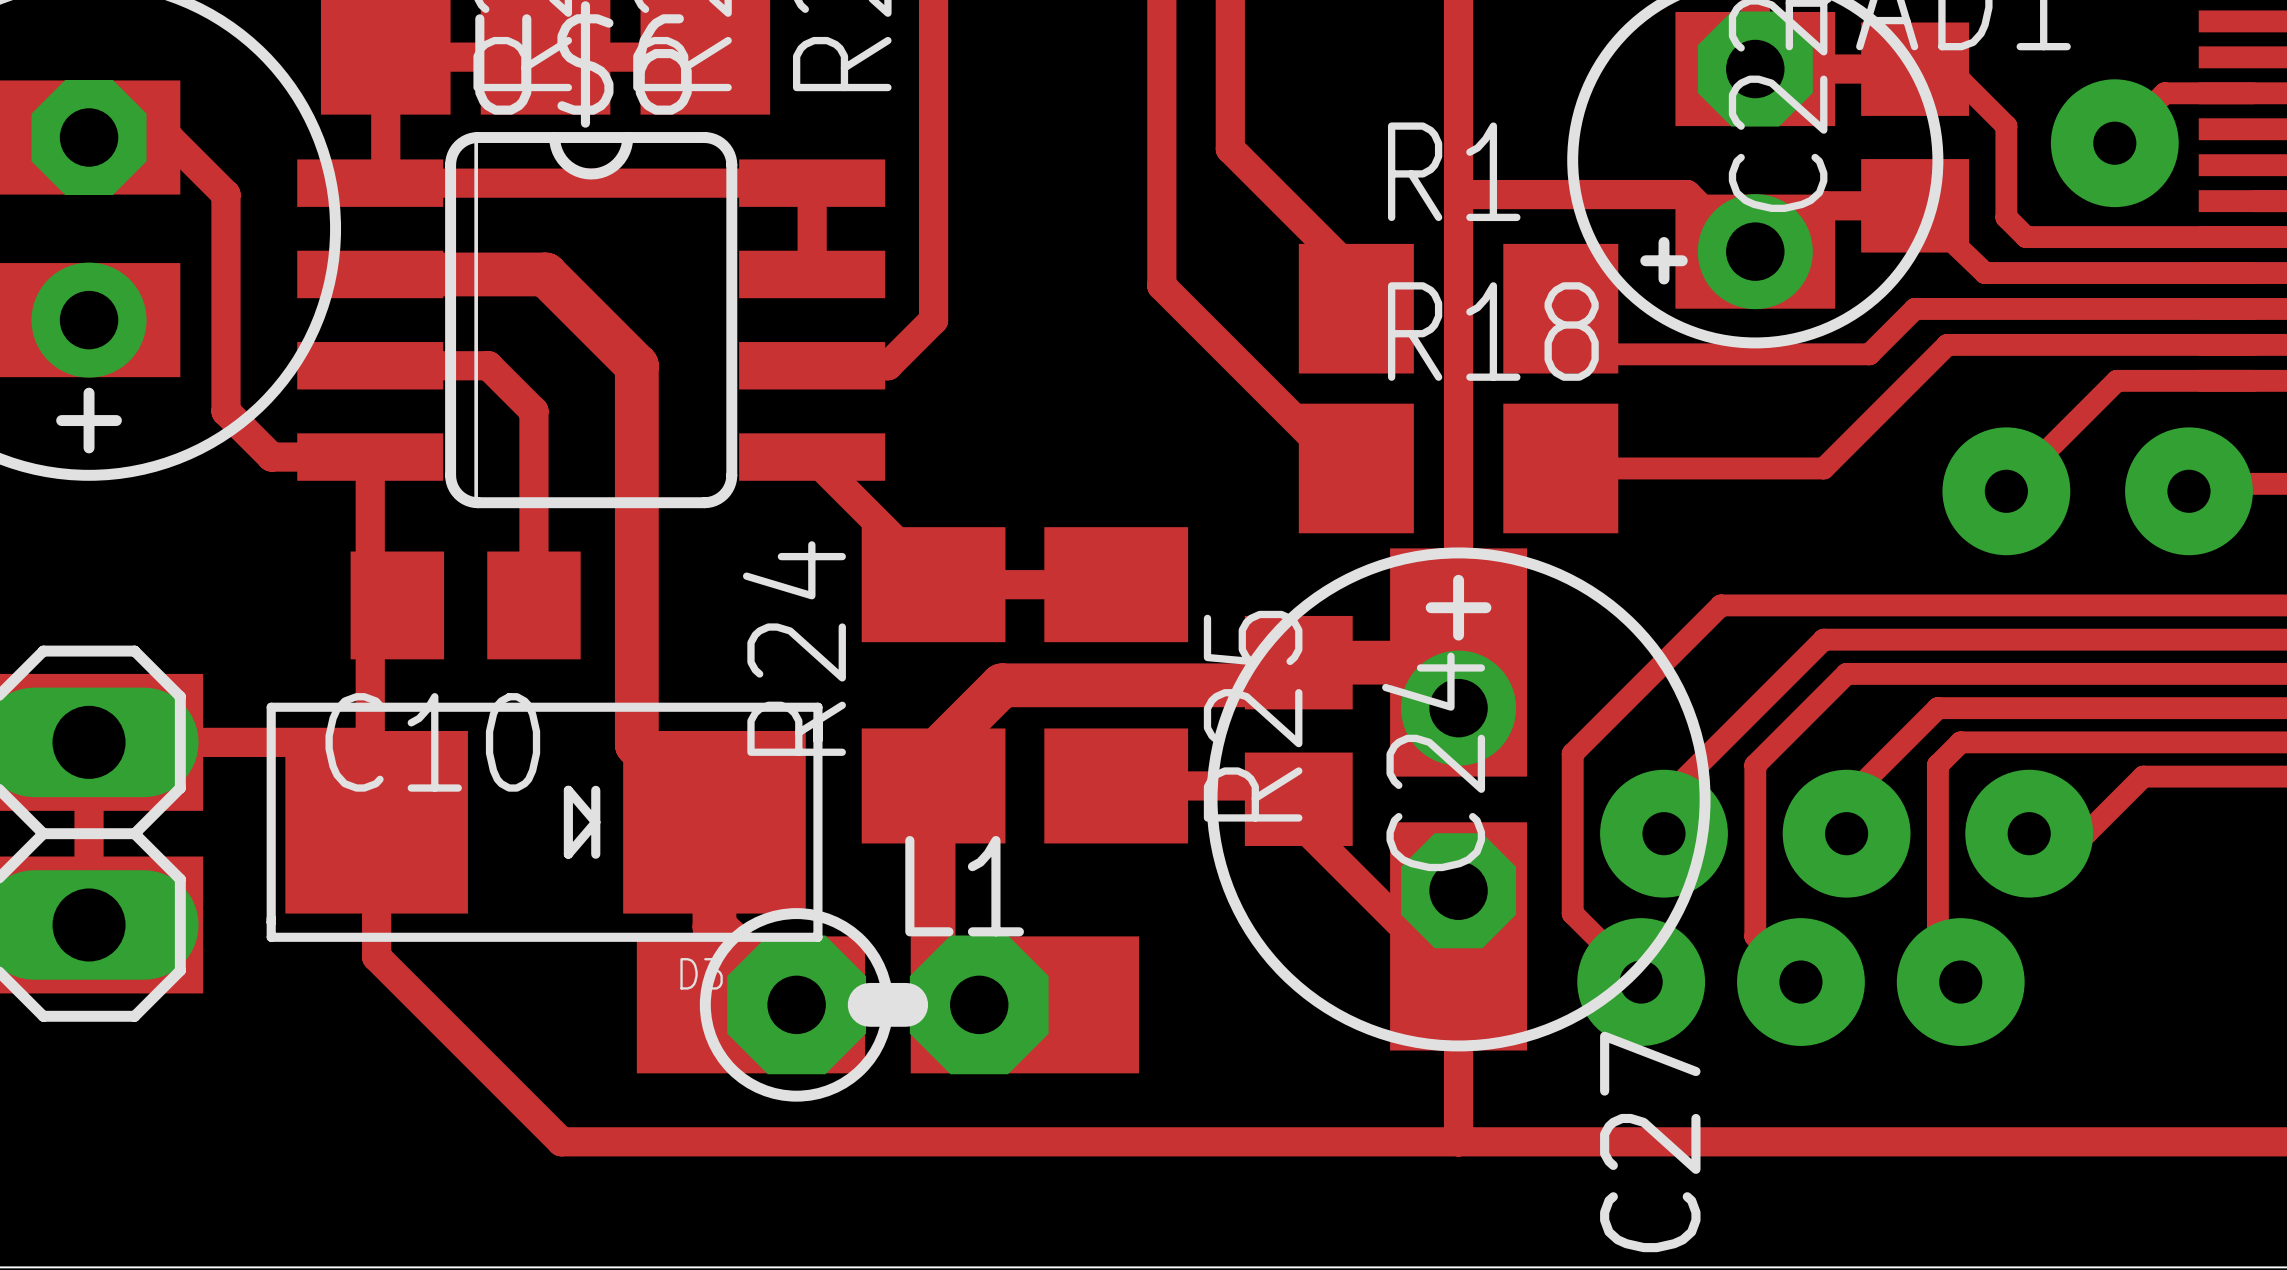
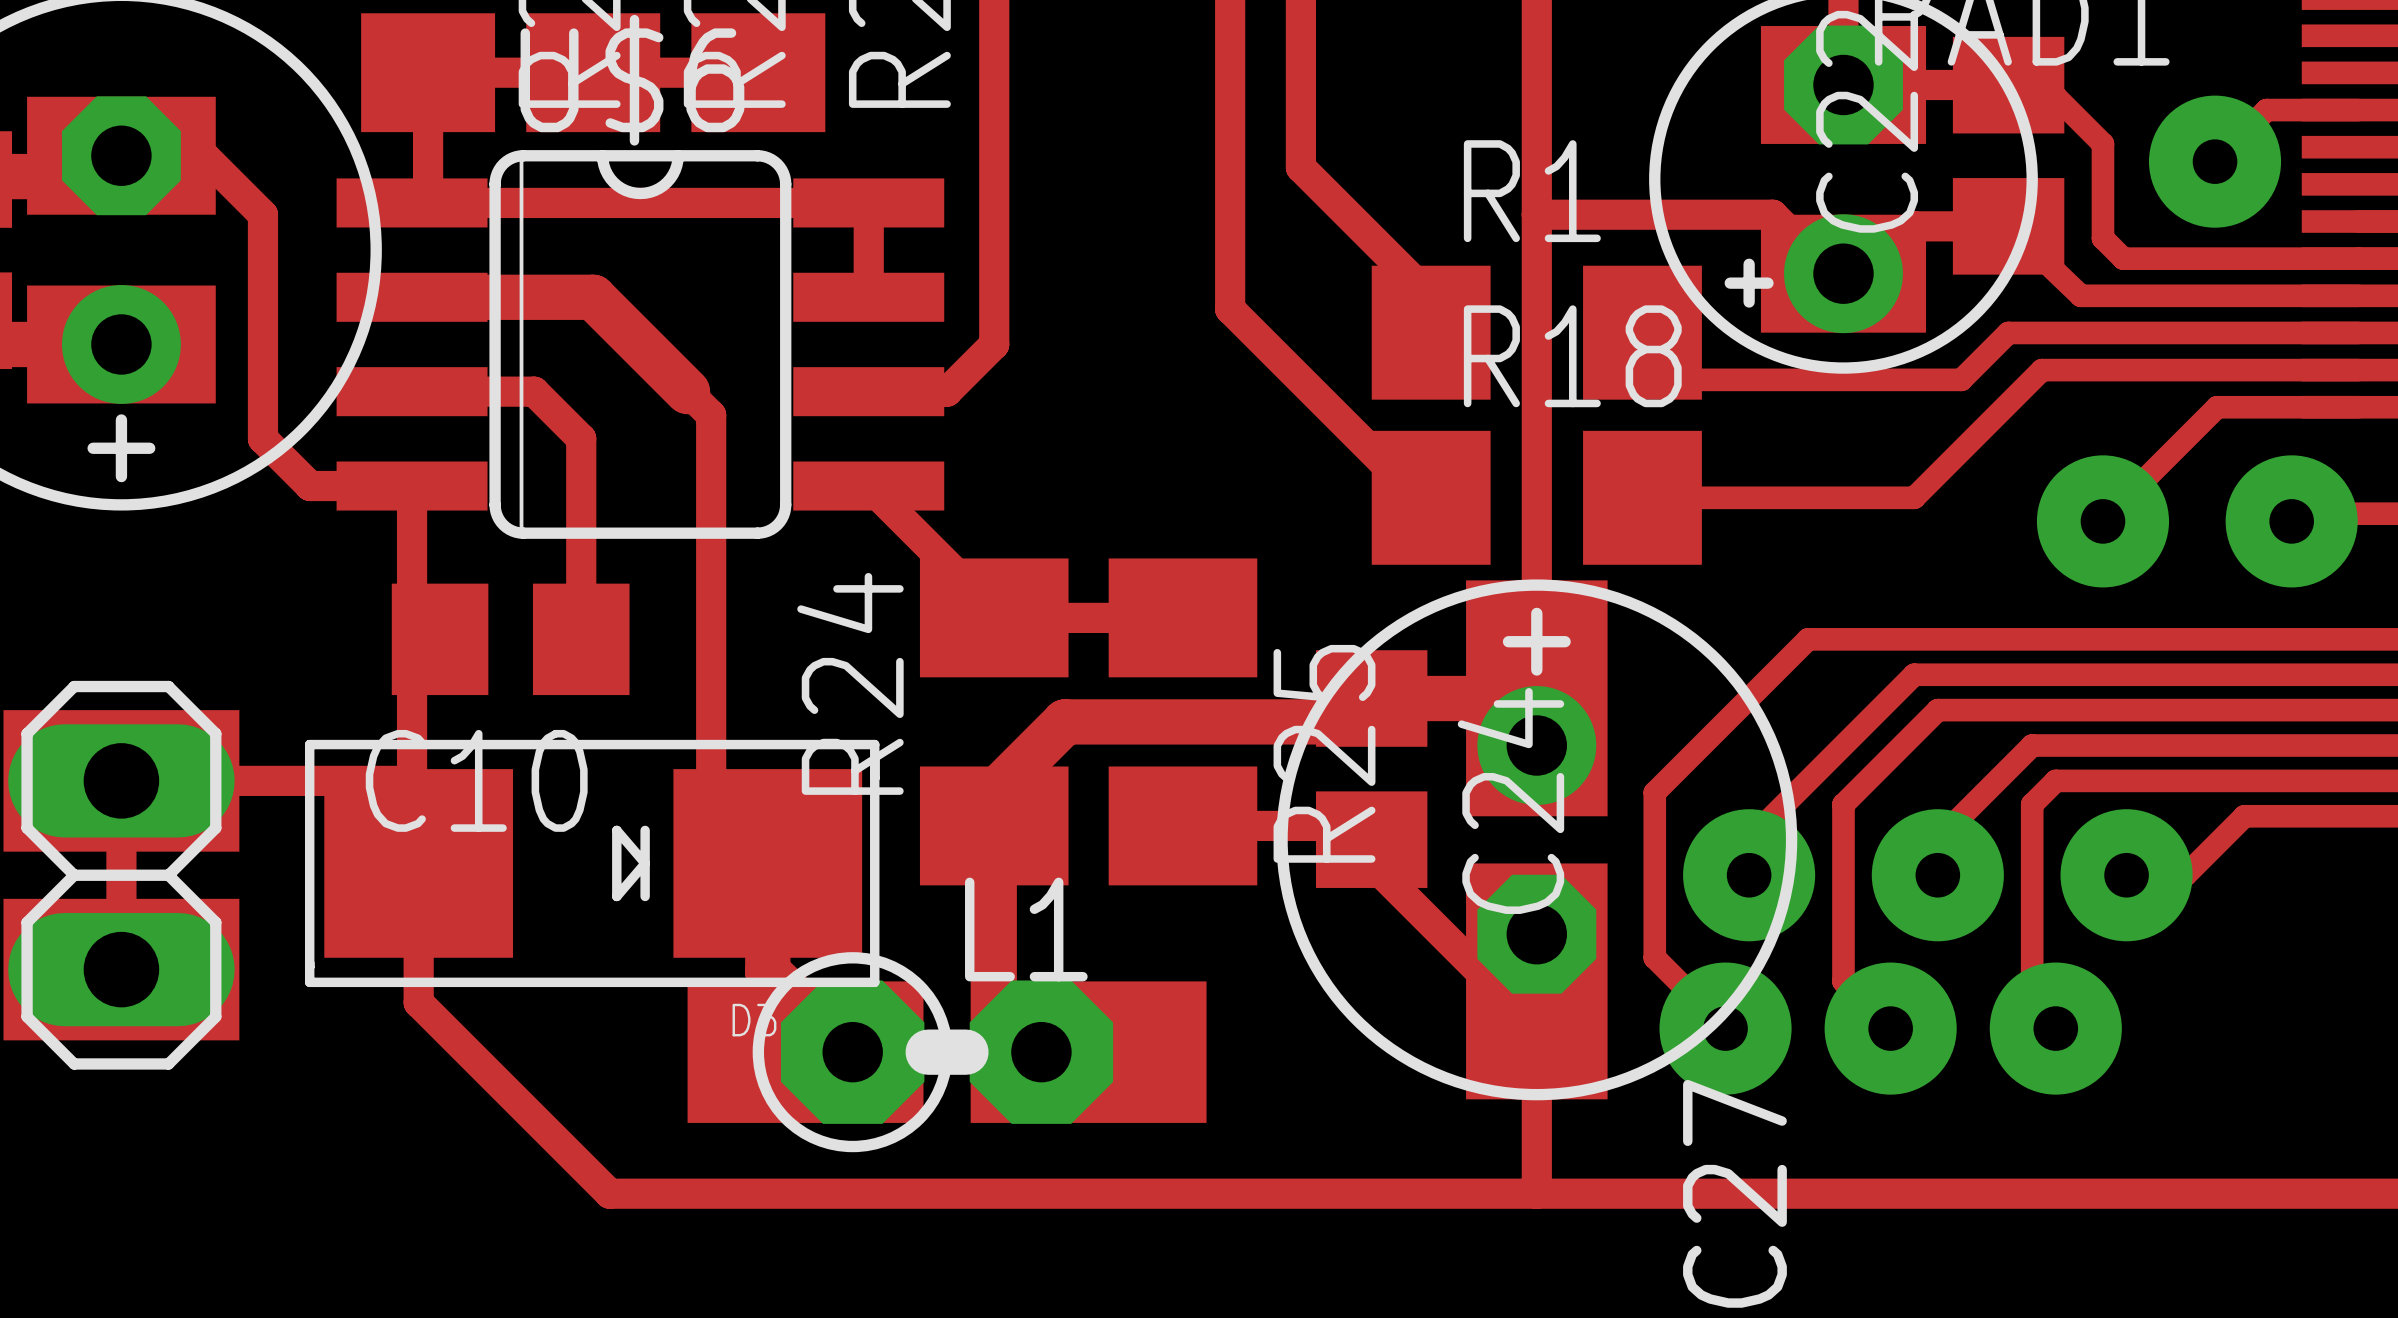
track: (636, 365) (636, 744) (659, 767) -> (687, 391) (711, 415) (711, 806)

